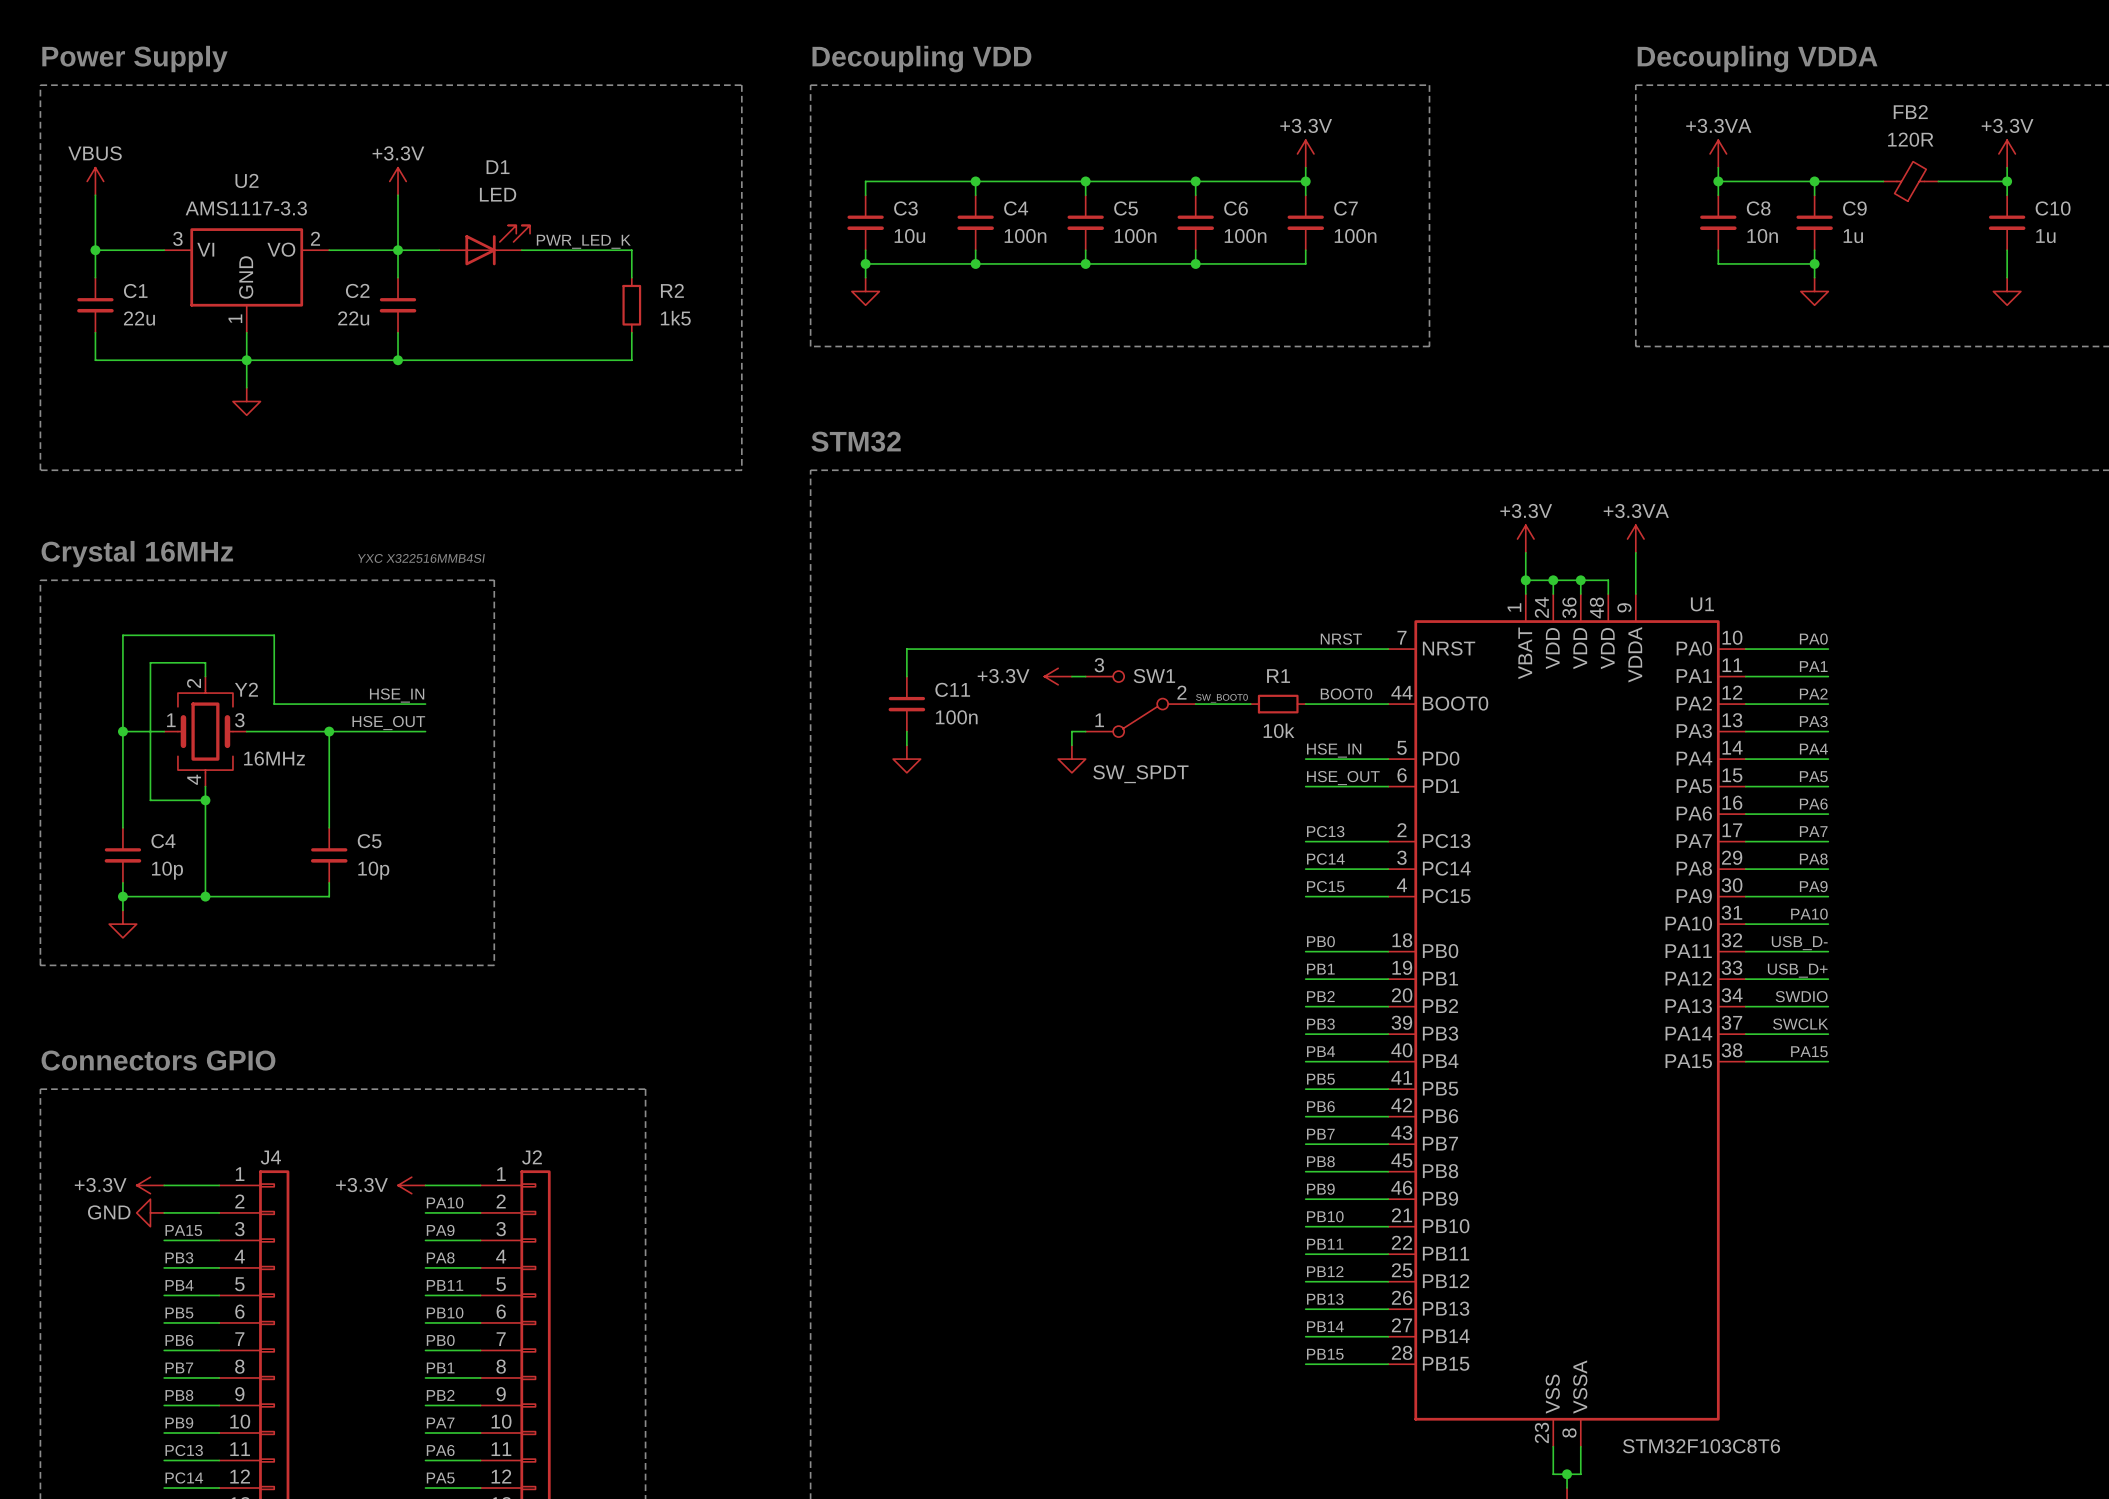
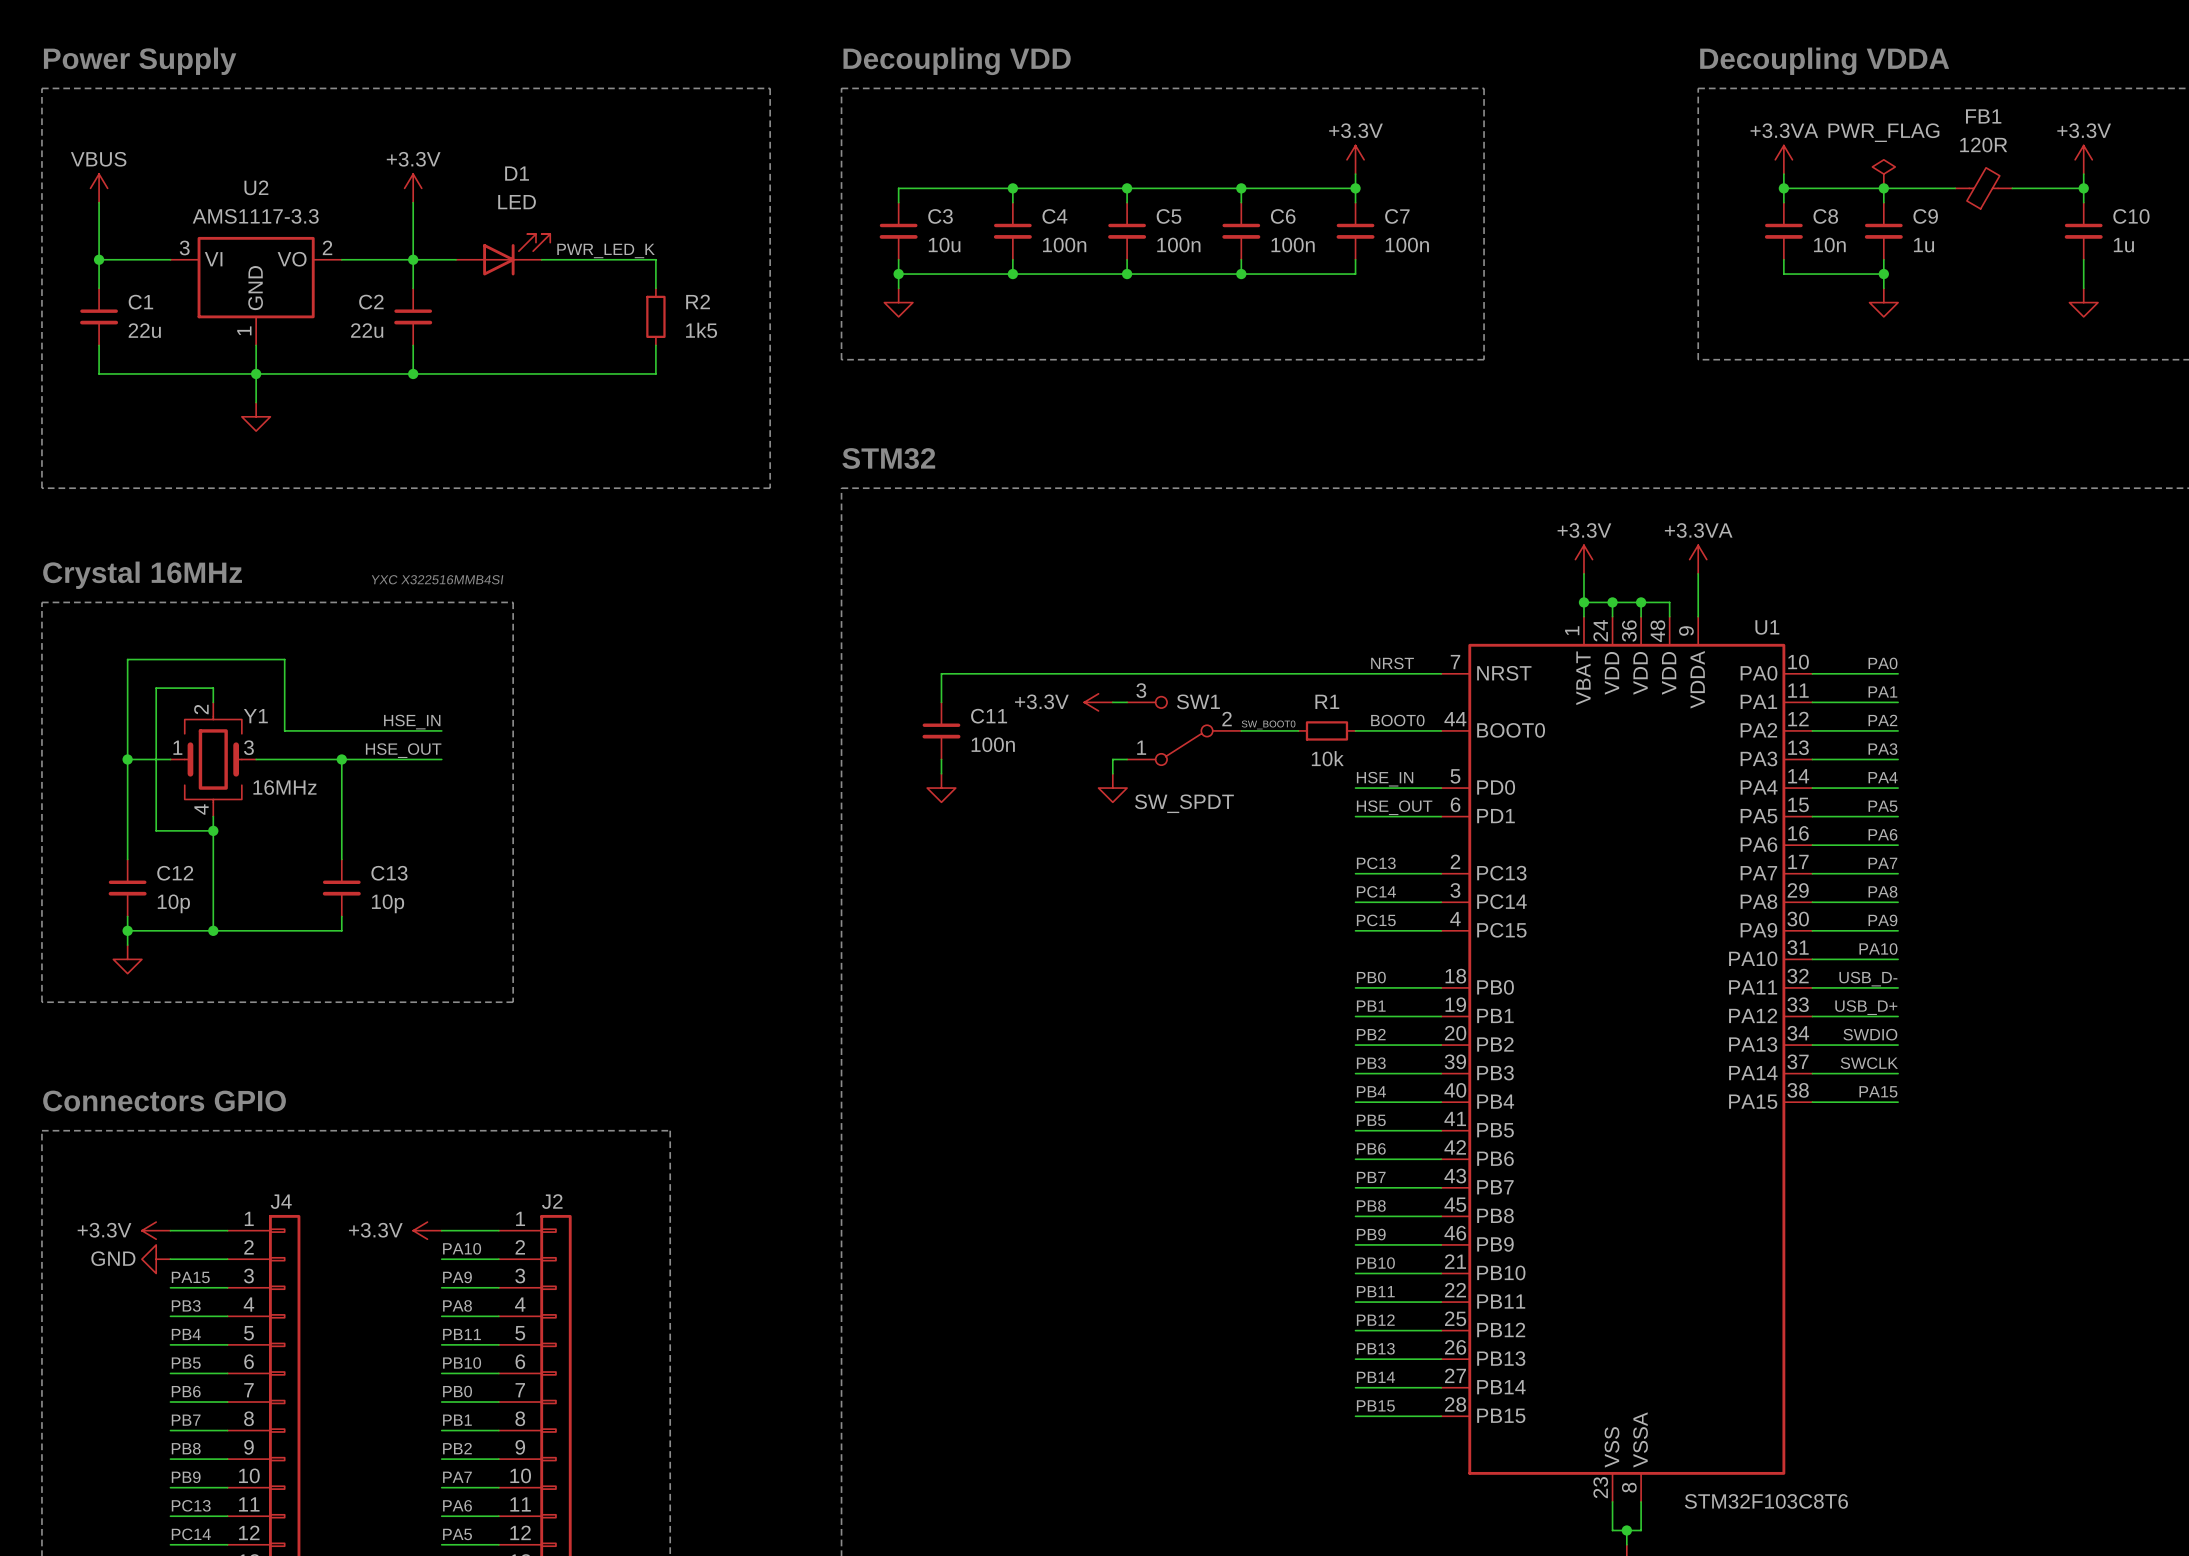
FB2 name: FB2 (1910, 112) -> FB1 (1983, 116)
power symbol: none -> PWR_FLAG (1883, 174)
Y2 name: Y2 (246, 689) -> Y1 (255, 716)
C4 name: C4 (163, 841) -> C12 (175, 873)
C5 name: C5 (369, 841) -> C13 (389, 873)

